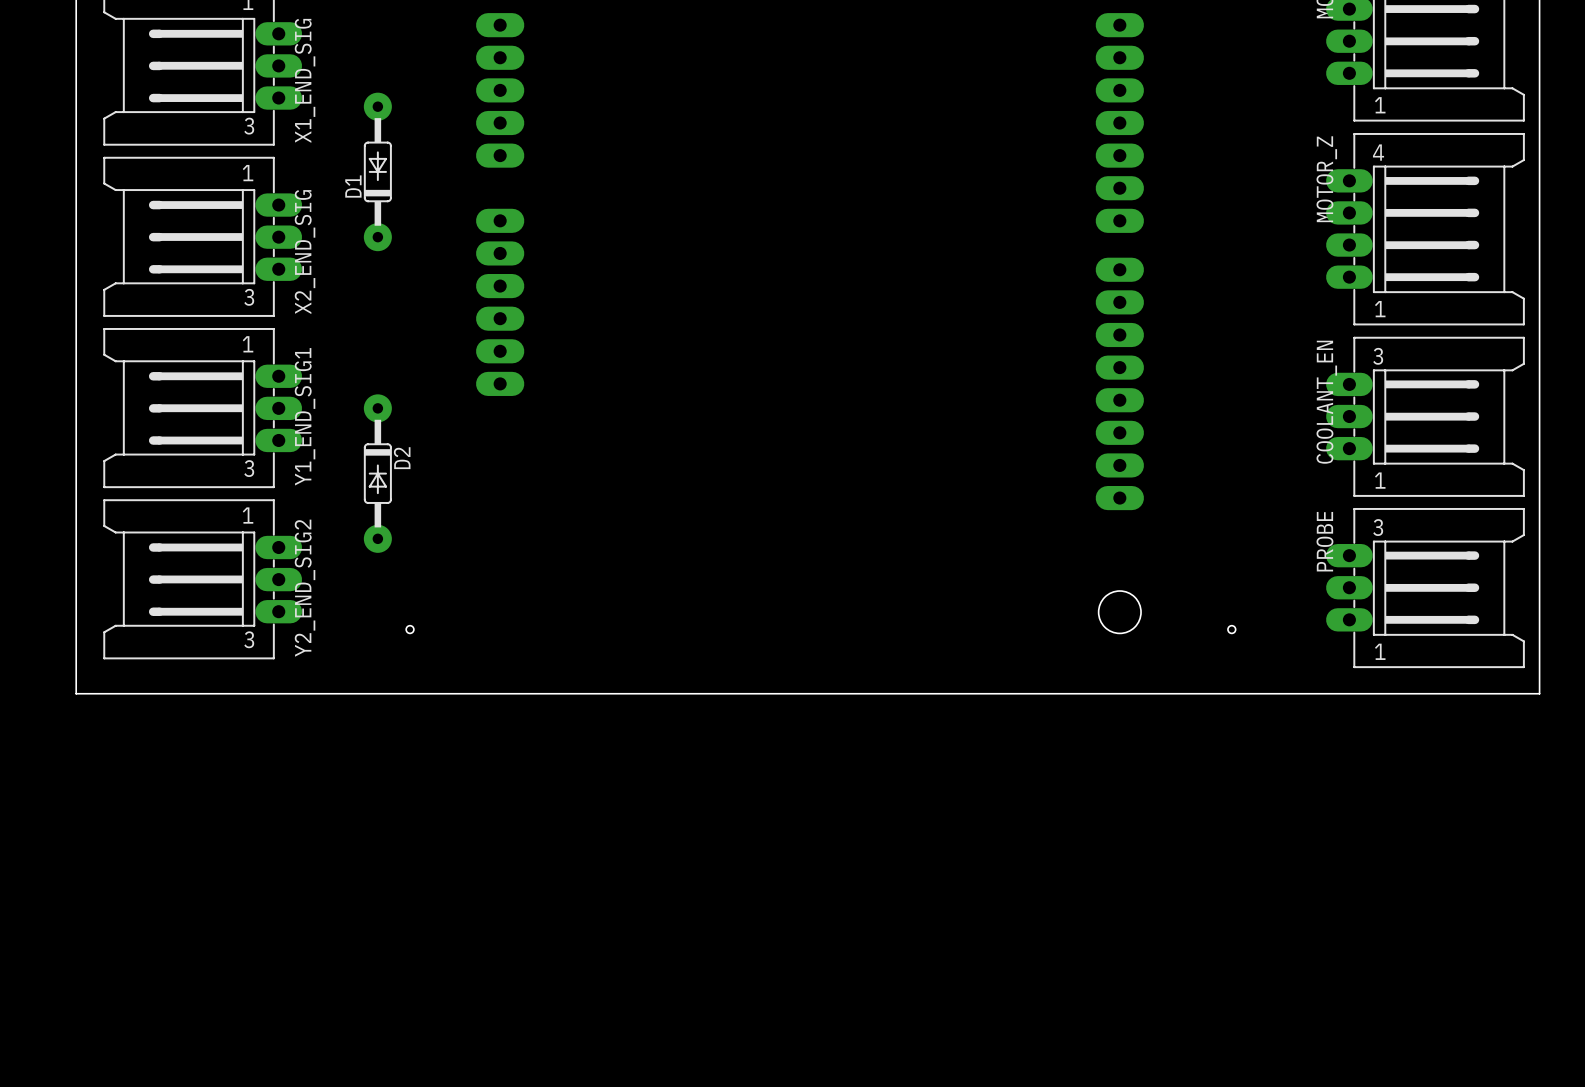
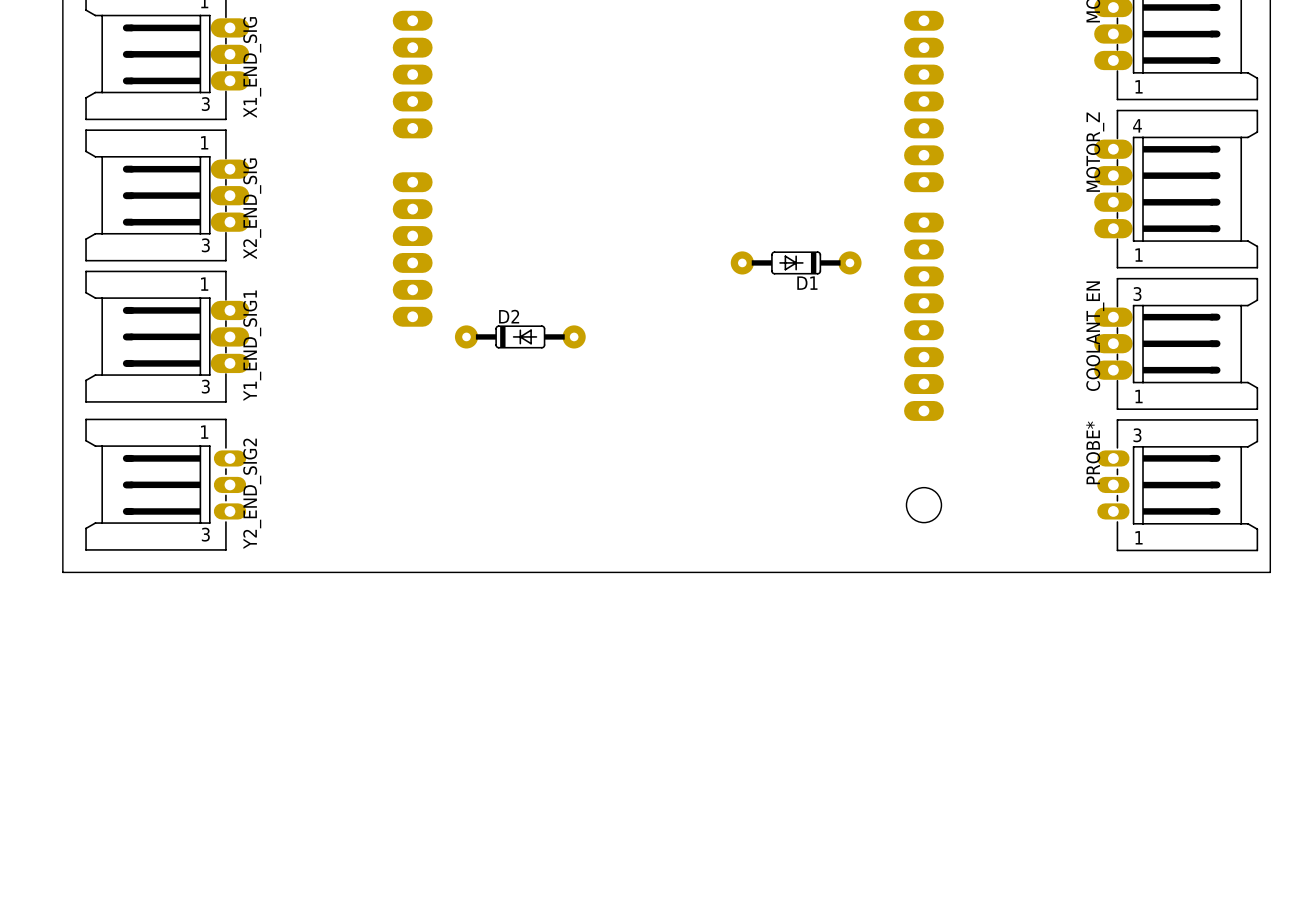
D1 rotation: 0° (377, 171) -> 90° counterclockwise (796, 262)
D1 position: (377, 171) -> (796, 262)
D2 rotation: 0° (377, 473) -> 90° counterclockwise (520, 336)
D2 position: (377, 473) -> (520, 336)
Y2_END_SIG2 footprint: [103, 499, 303, 660] -> [85, 418, 247, 551]
PROBE: (1425, 588) -> none
PROBE*: none -> (1177, 485)
hole: (410, 629) -> none
hole: (1231, 629) -> none

